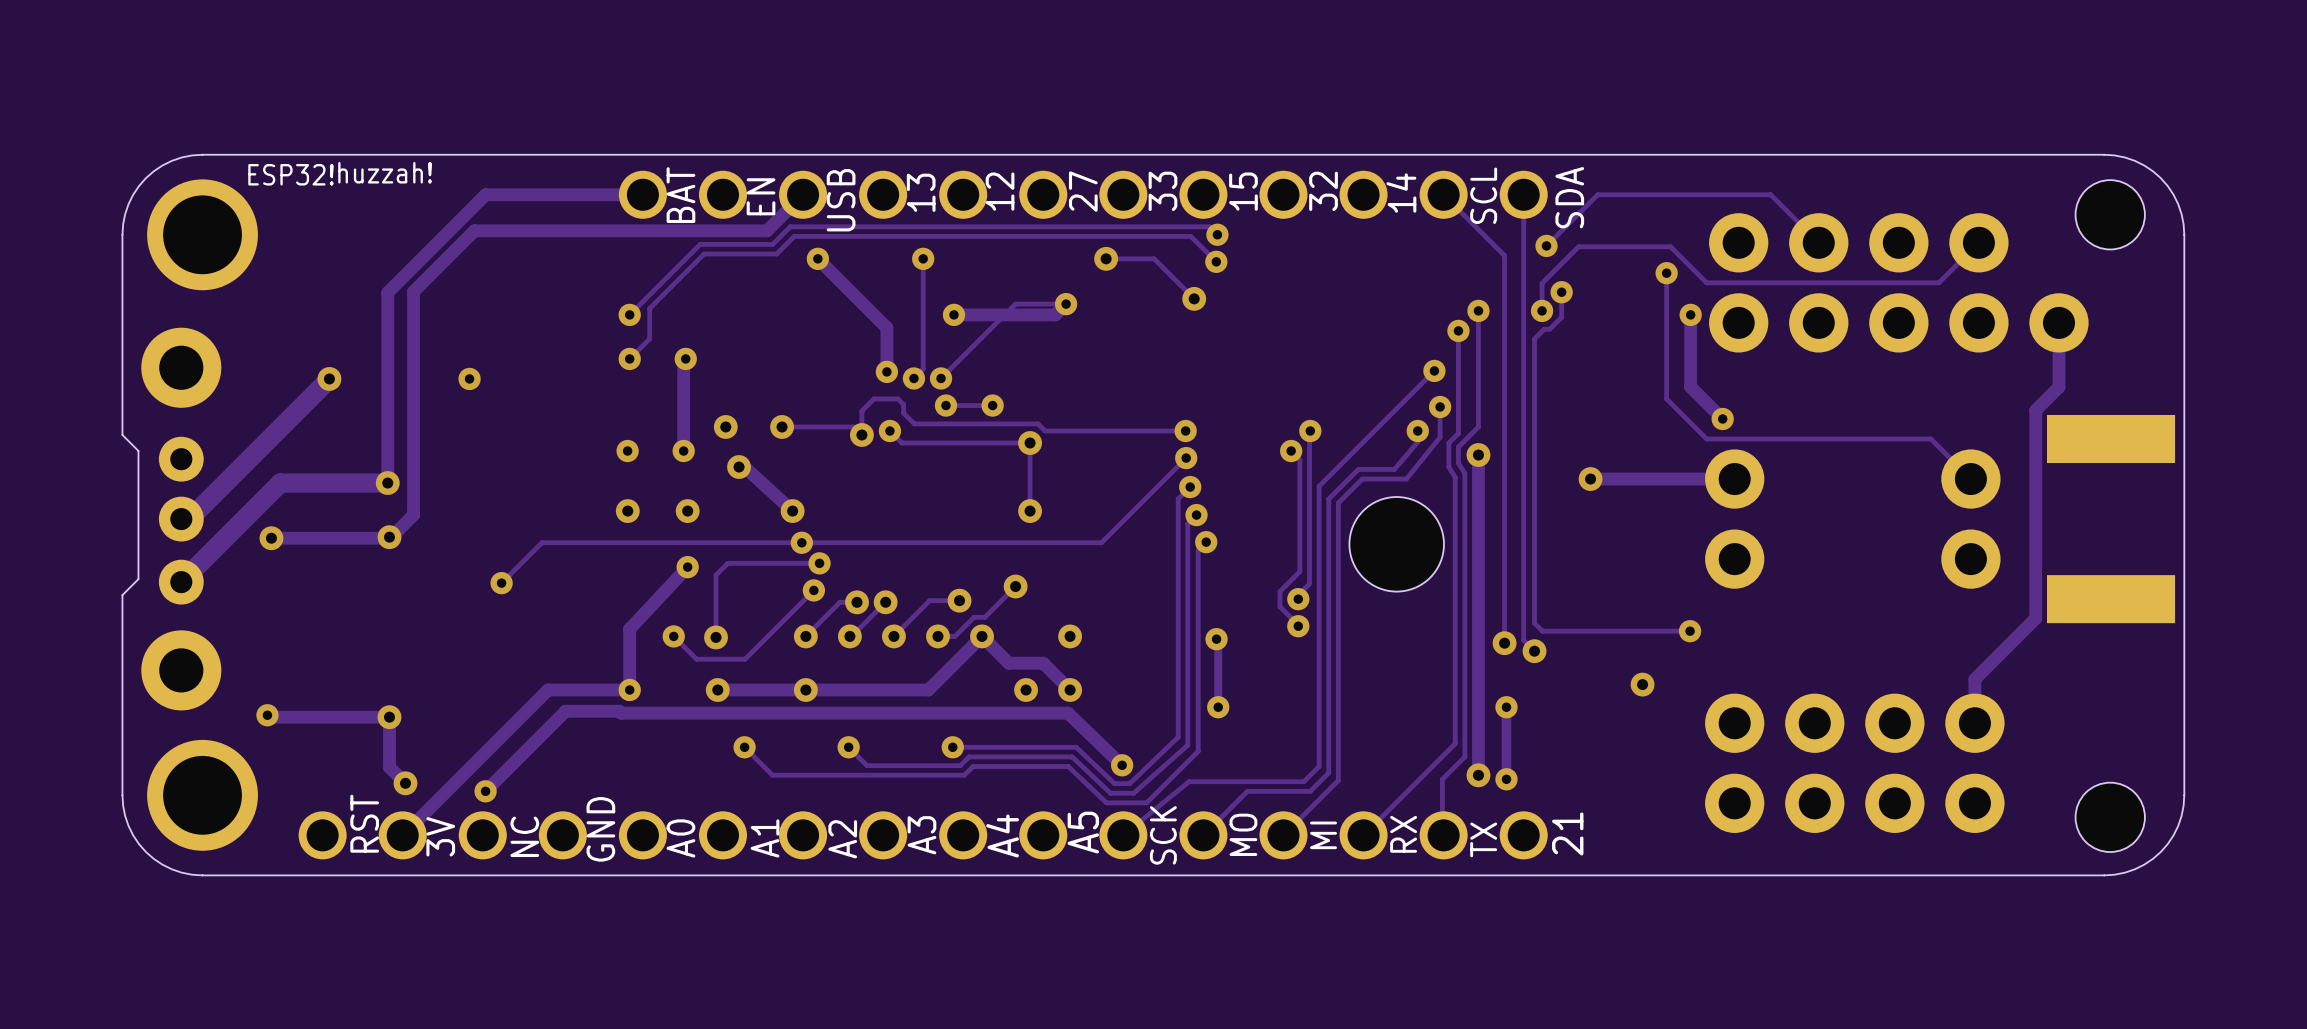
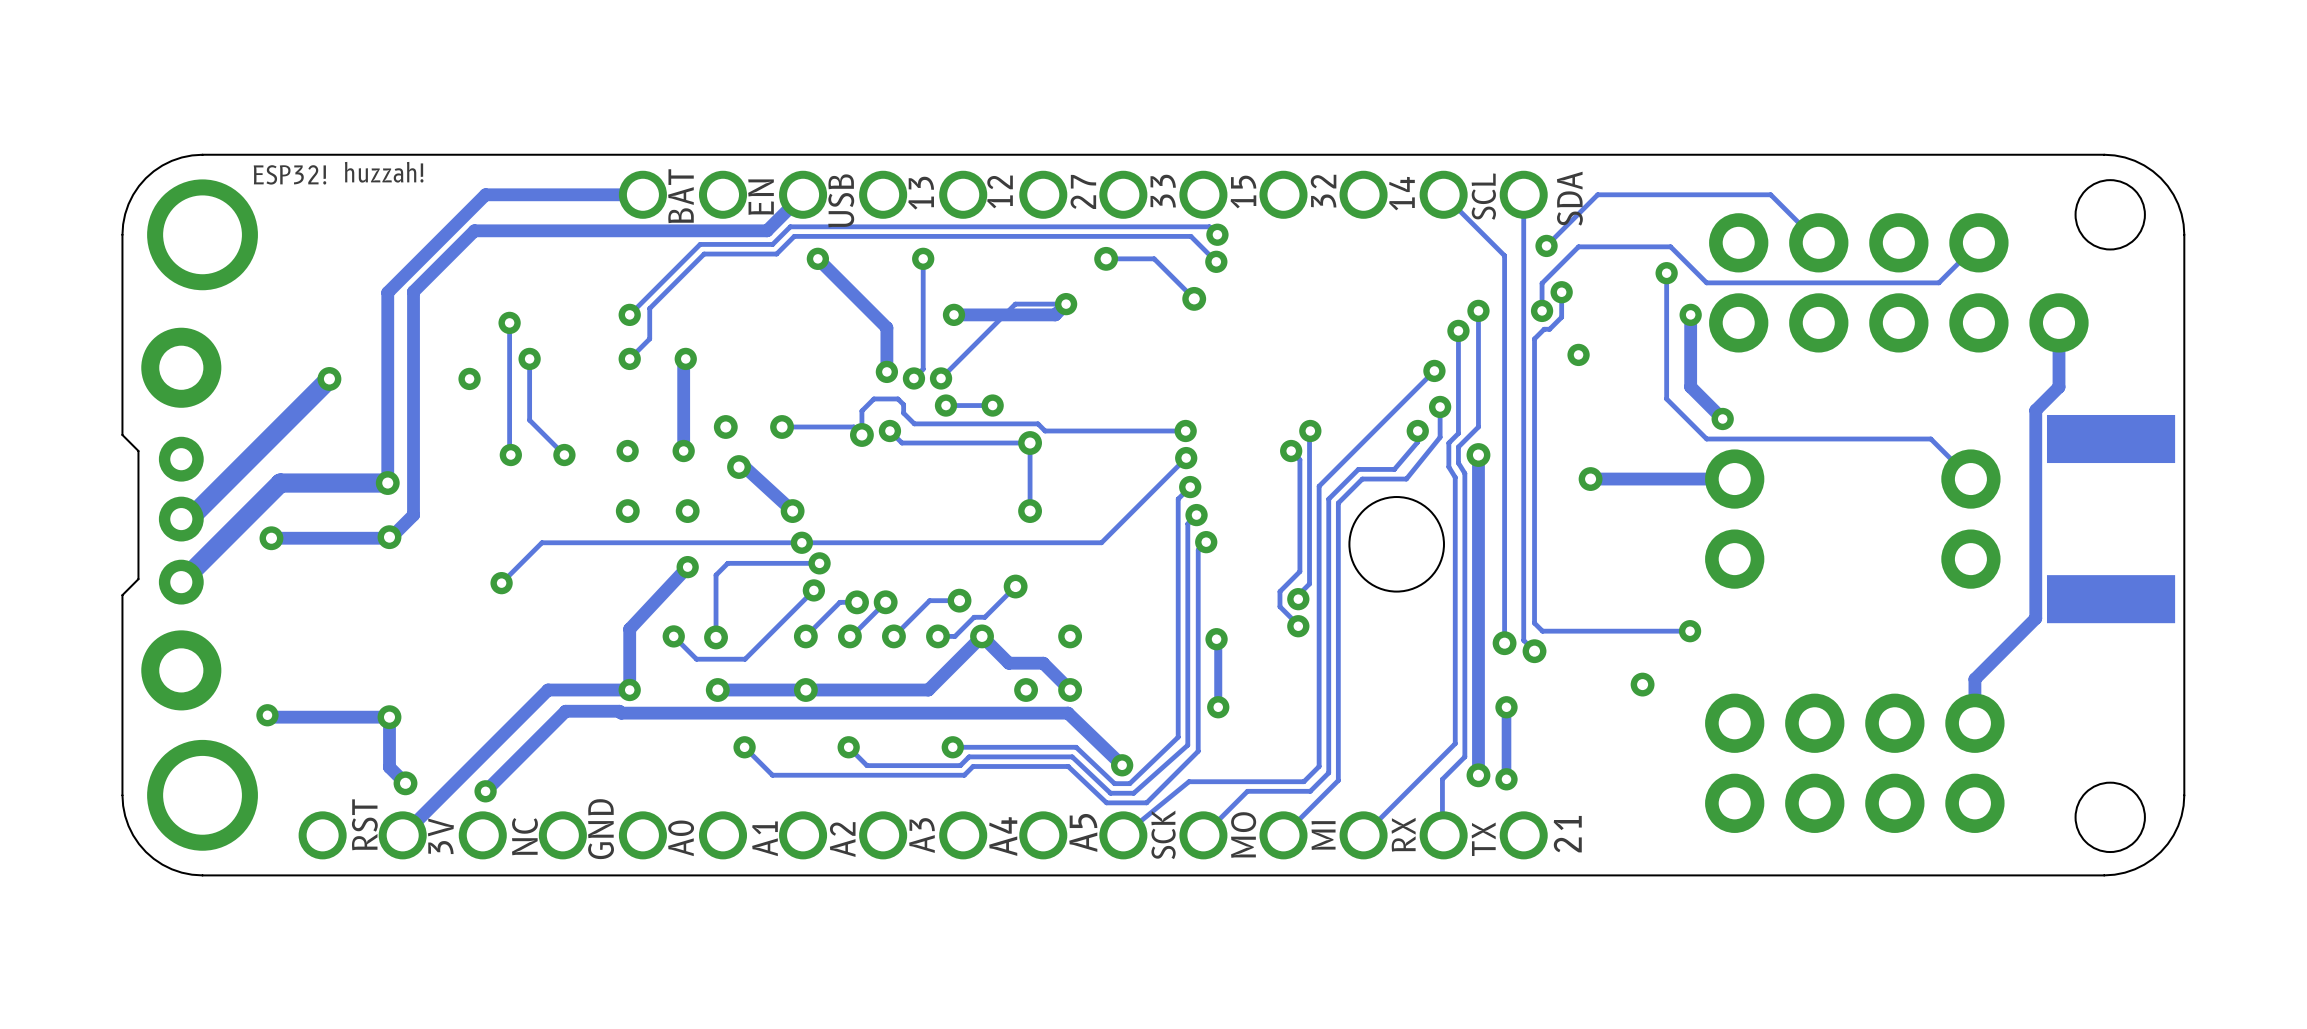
track: none -> (509, 322) (510, 455)
via: none -> (509, 322)
via: none -> (1578, 354)
track: none -> (529, 358) (529, 420) (564, 455)
via: none -> (529, 358)
via: none -> (510, 455)
via: none -> (564, 455)

